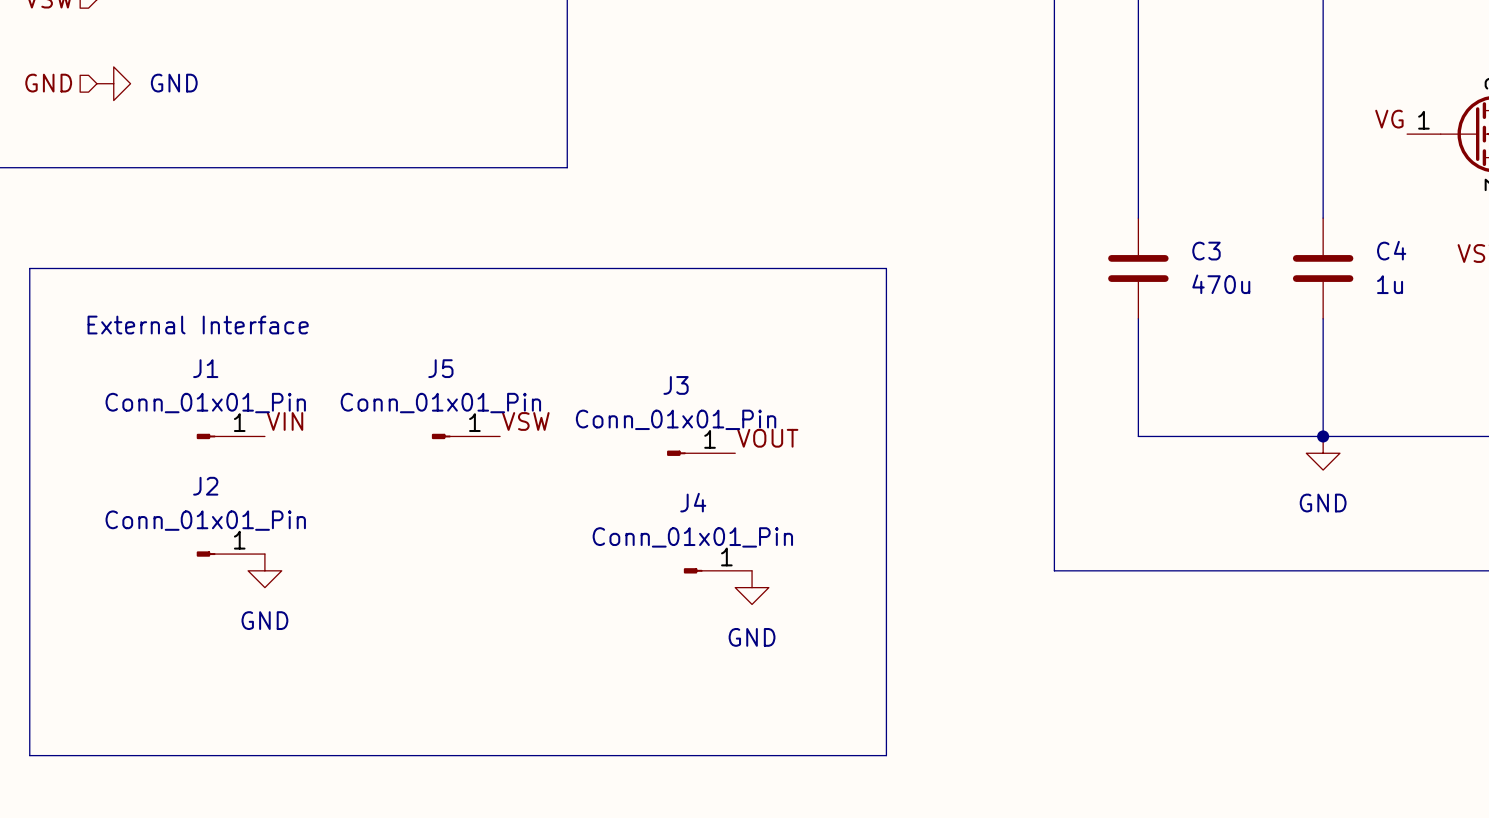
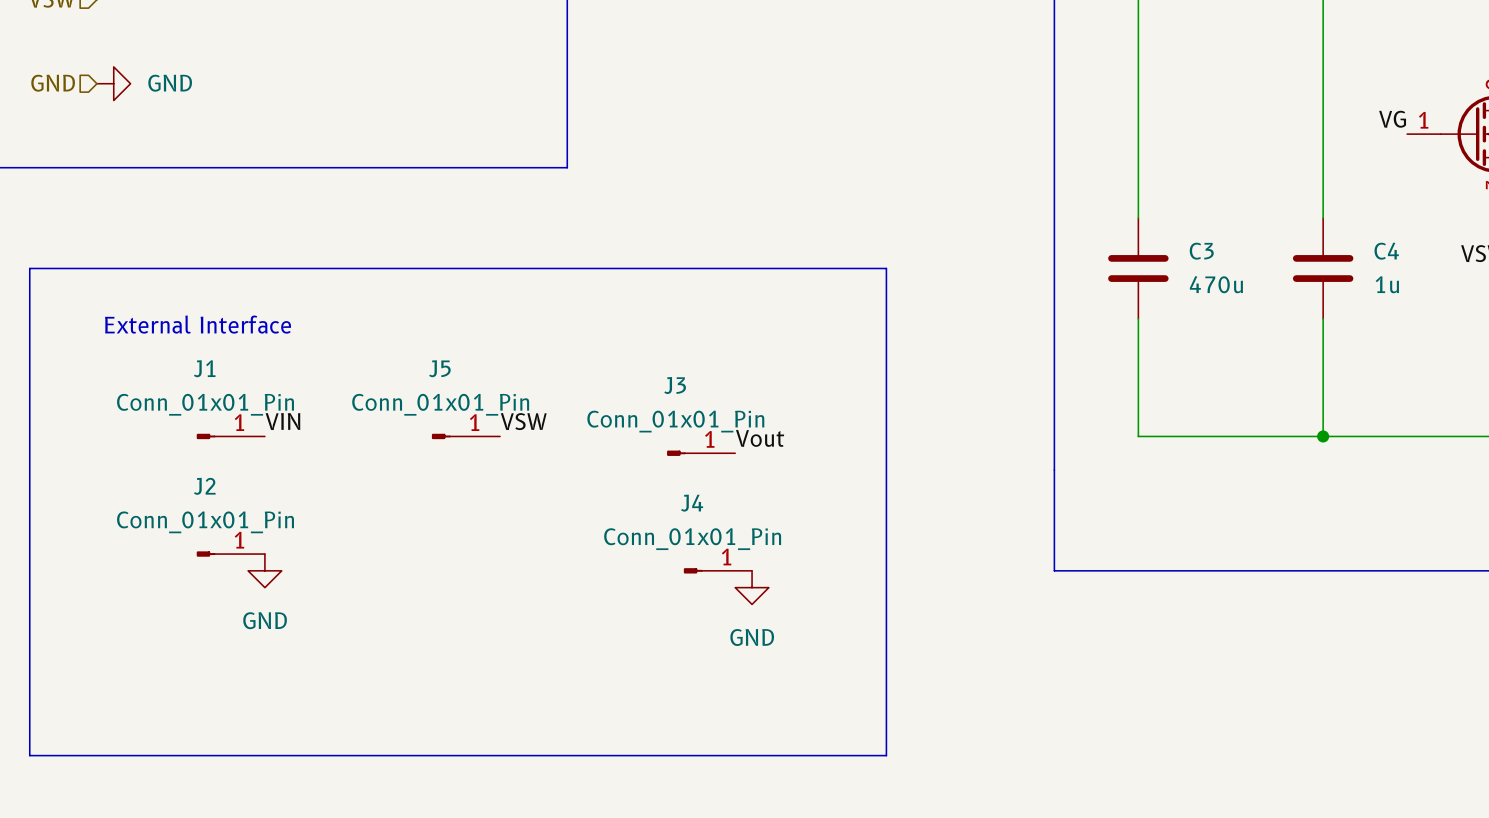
label: VOUT (767, 438) -> Vout (760, 438)
power symbol: GND (1323, 453) -> none

